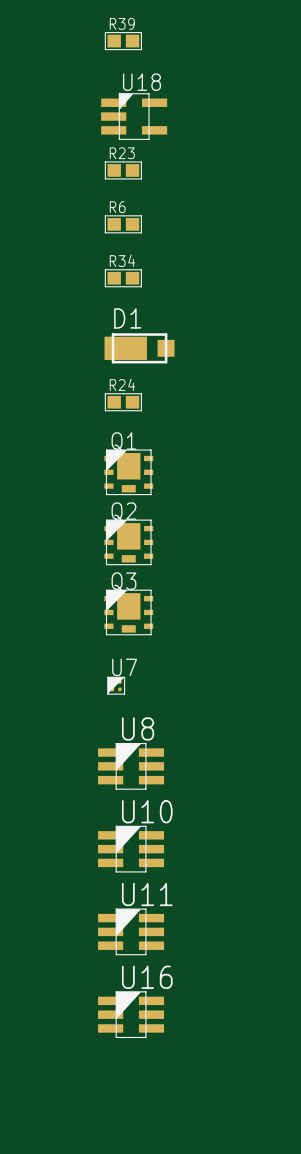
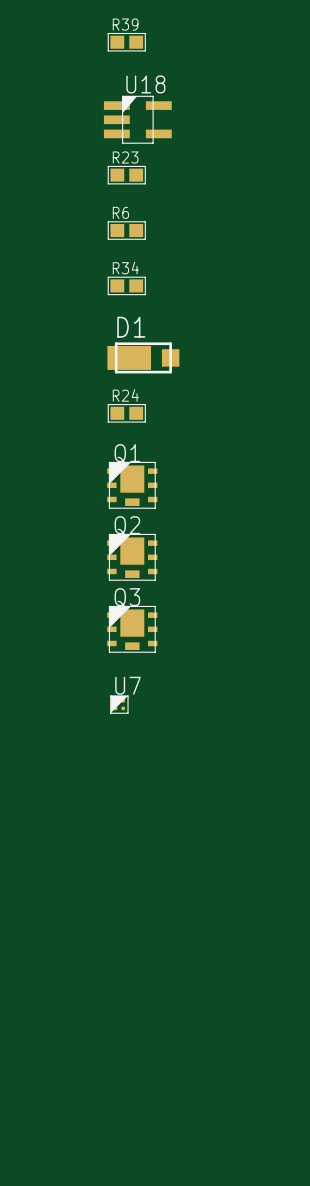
U8: (131, 766) -> none
U10: (131, 849) -> none
U11: (131, 931) -> none
U16: (131, 1014) -> none

